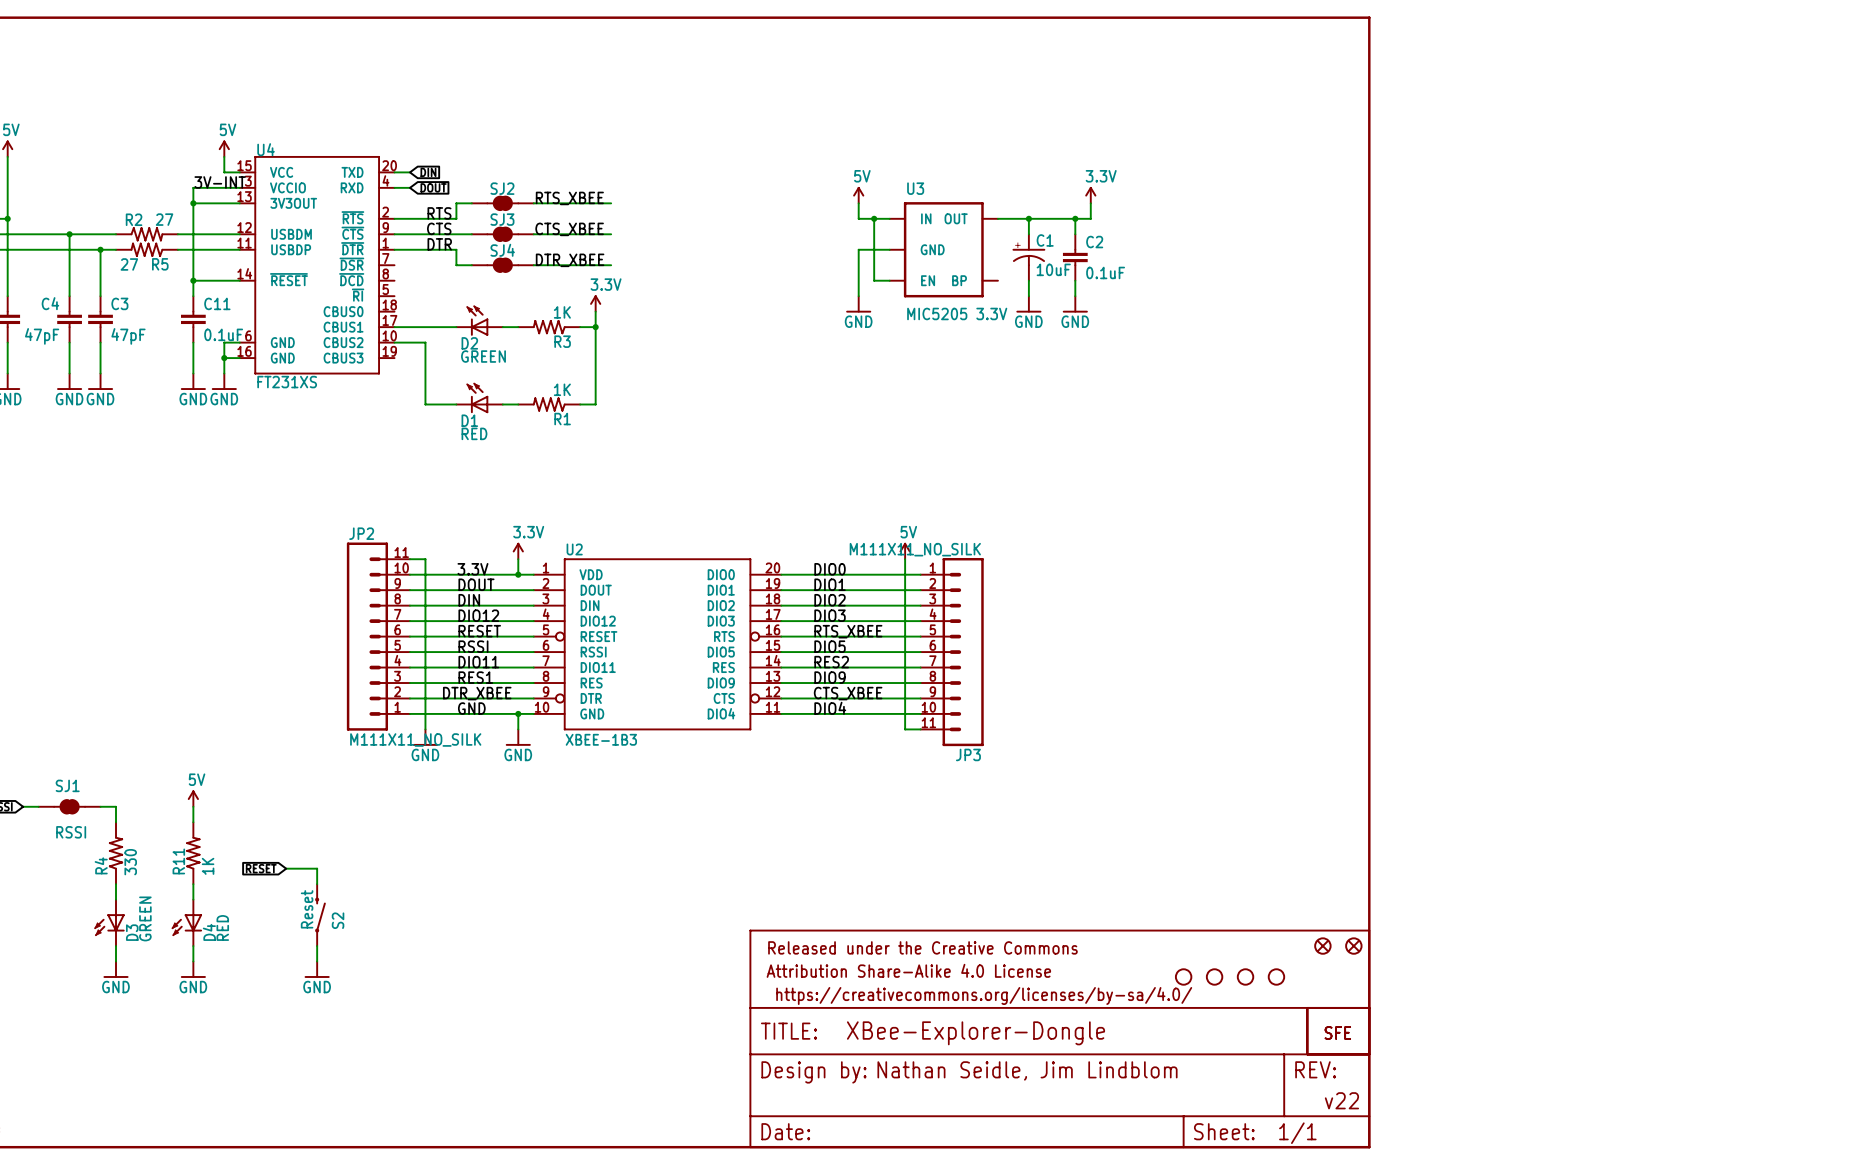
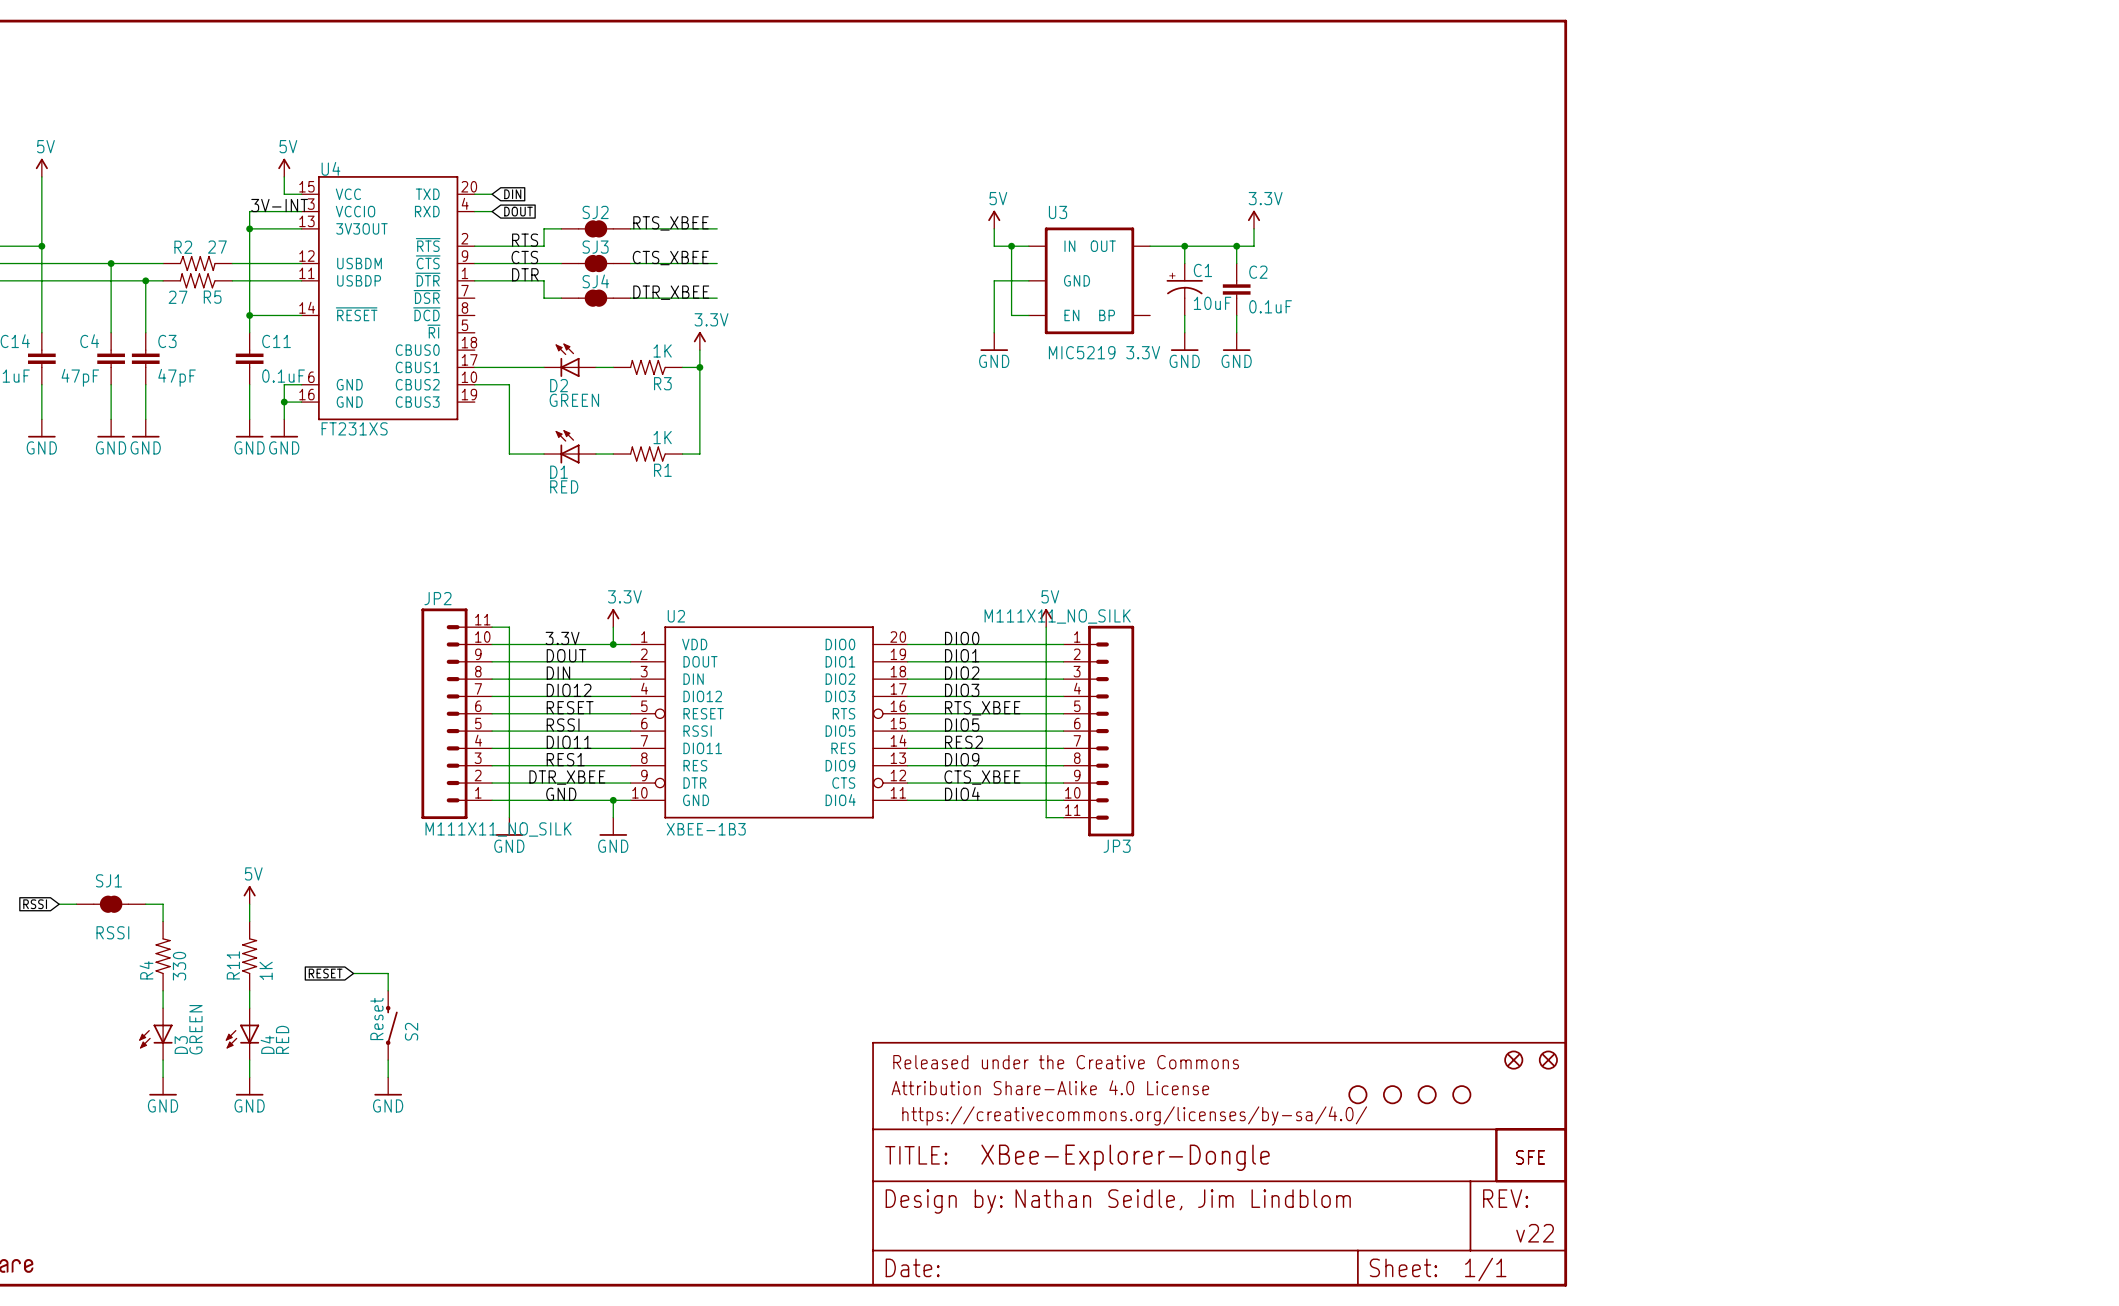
U3 value: MIC5205 3.3V (957, 313) -> MIC5219 3.3V (1104, 352)

